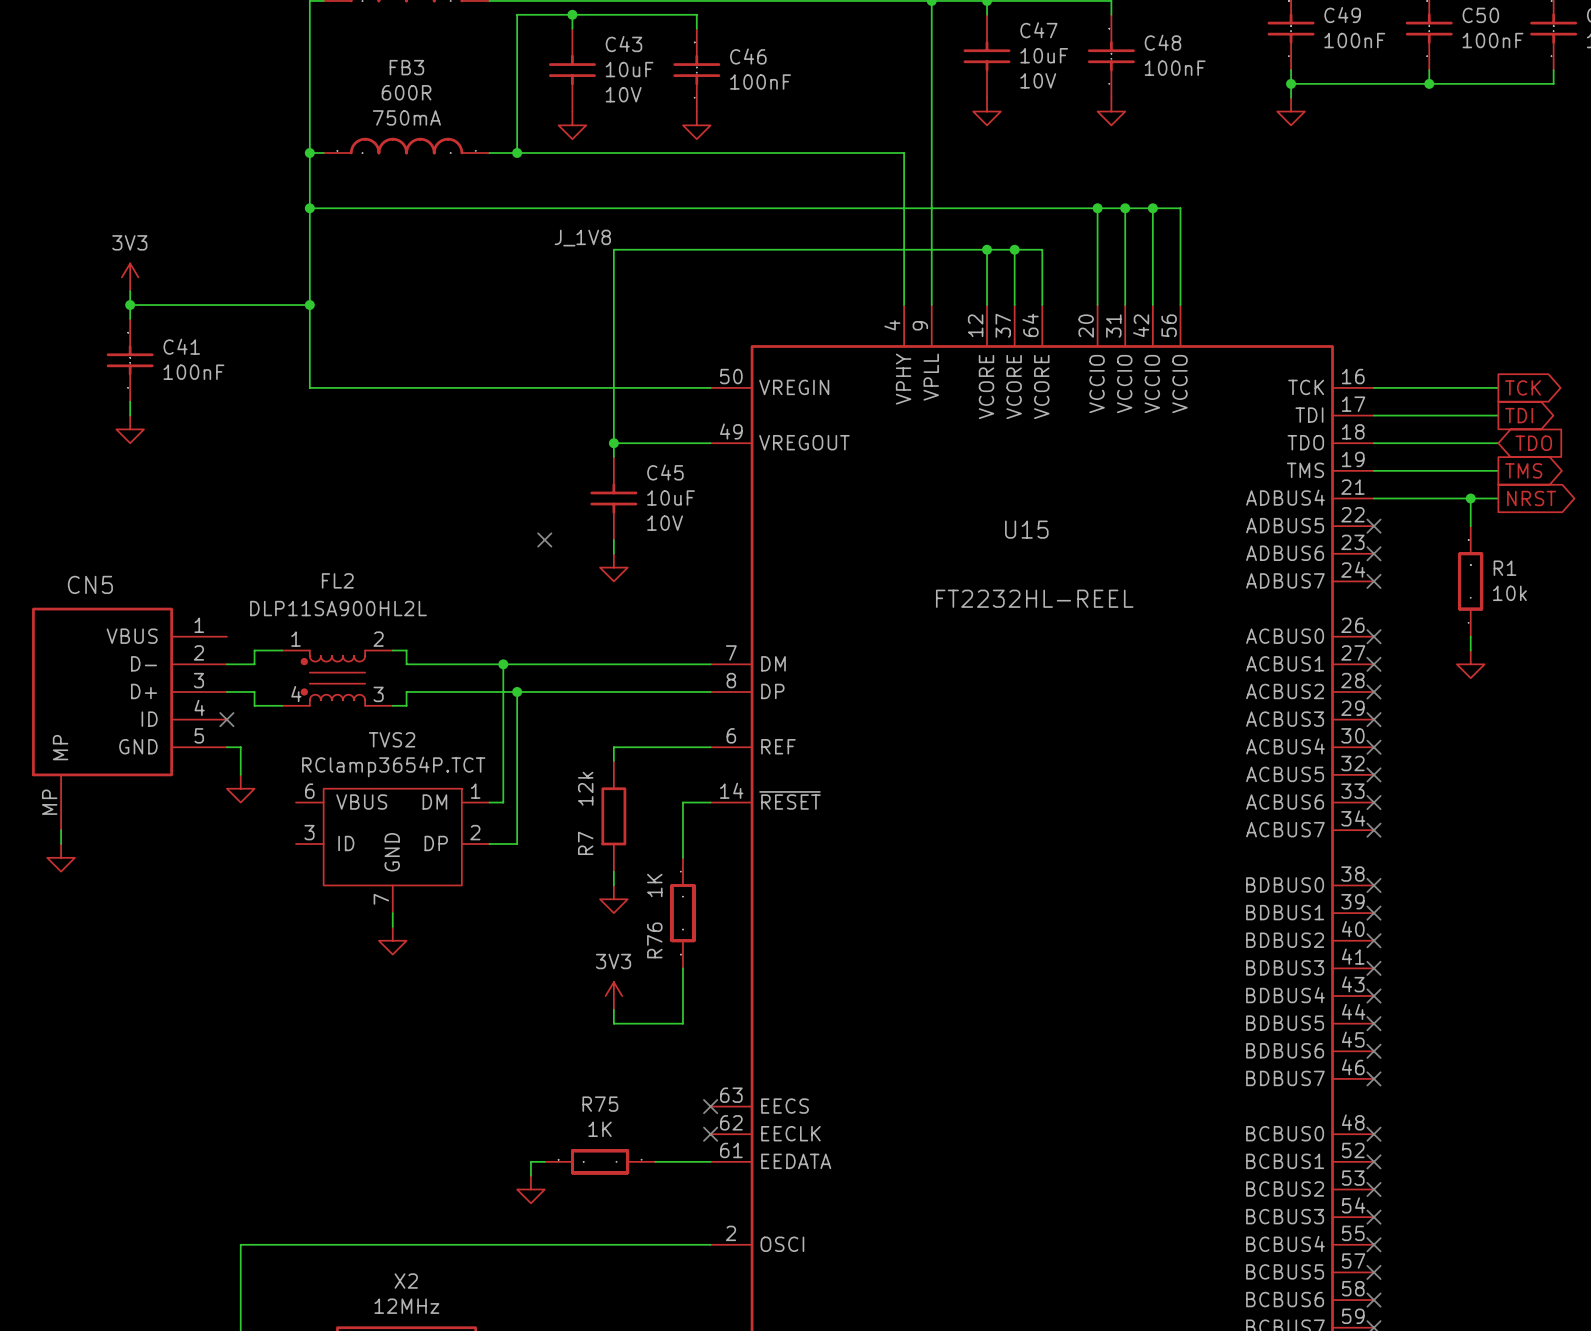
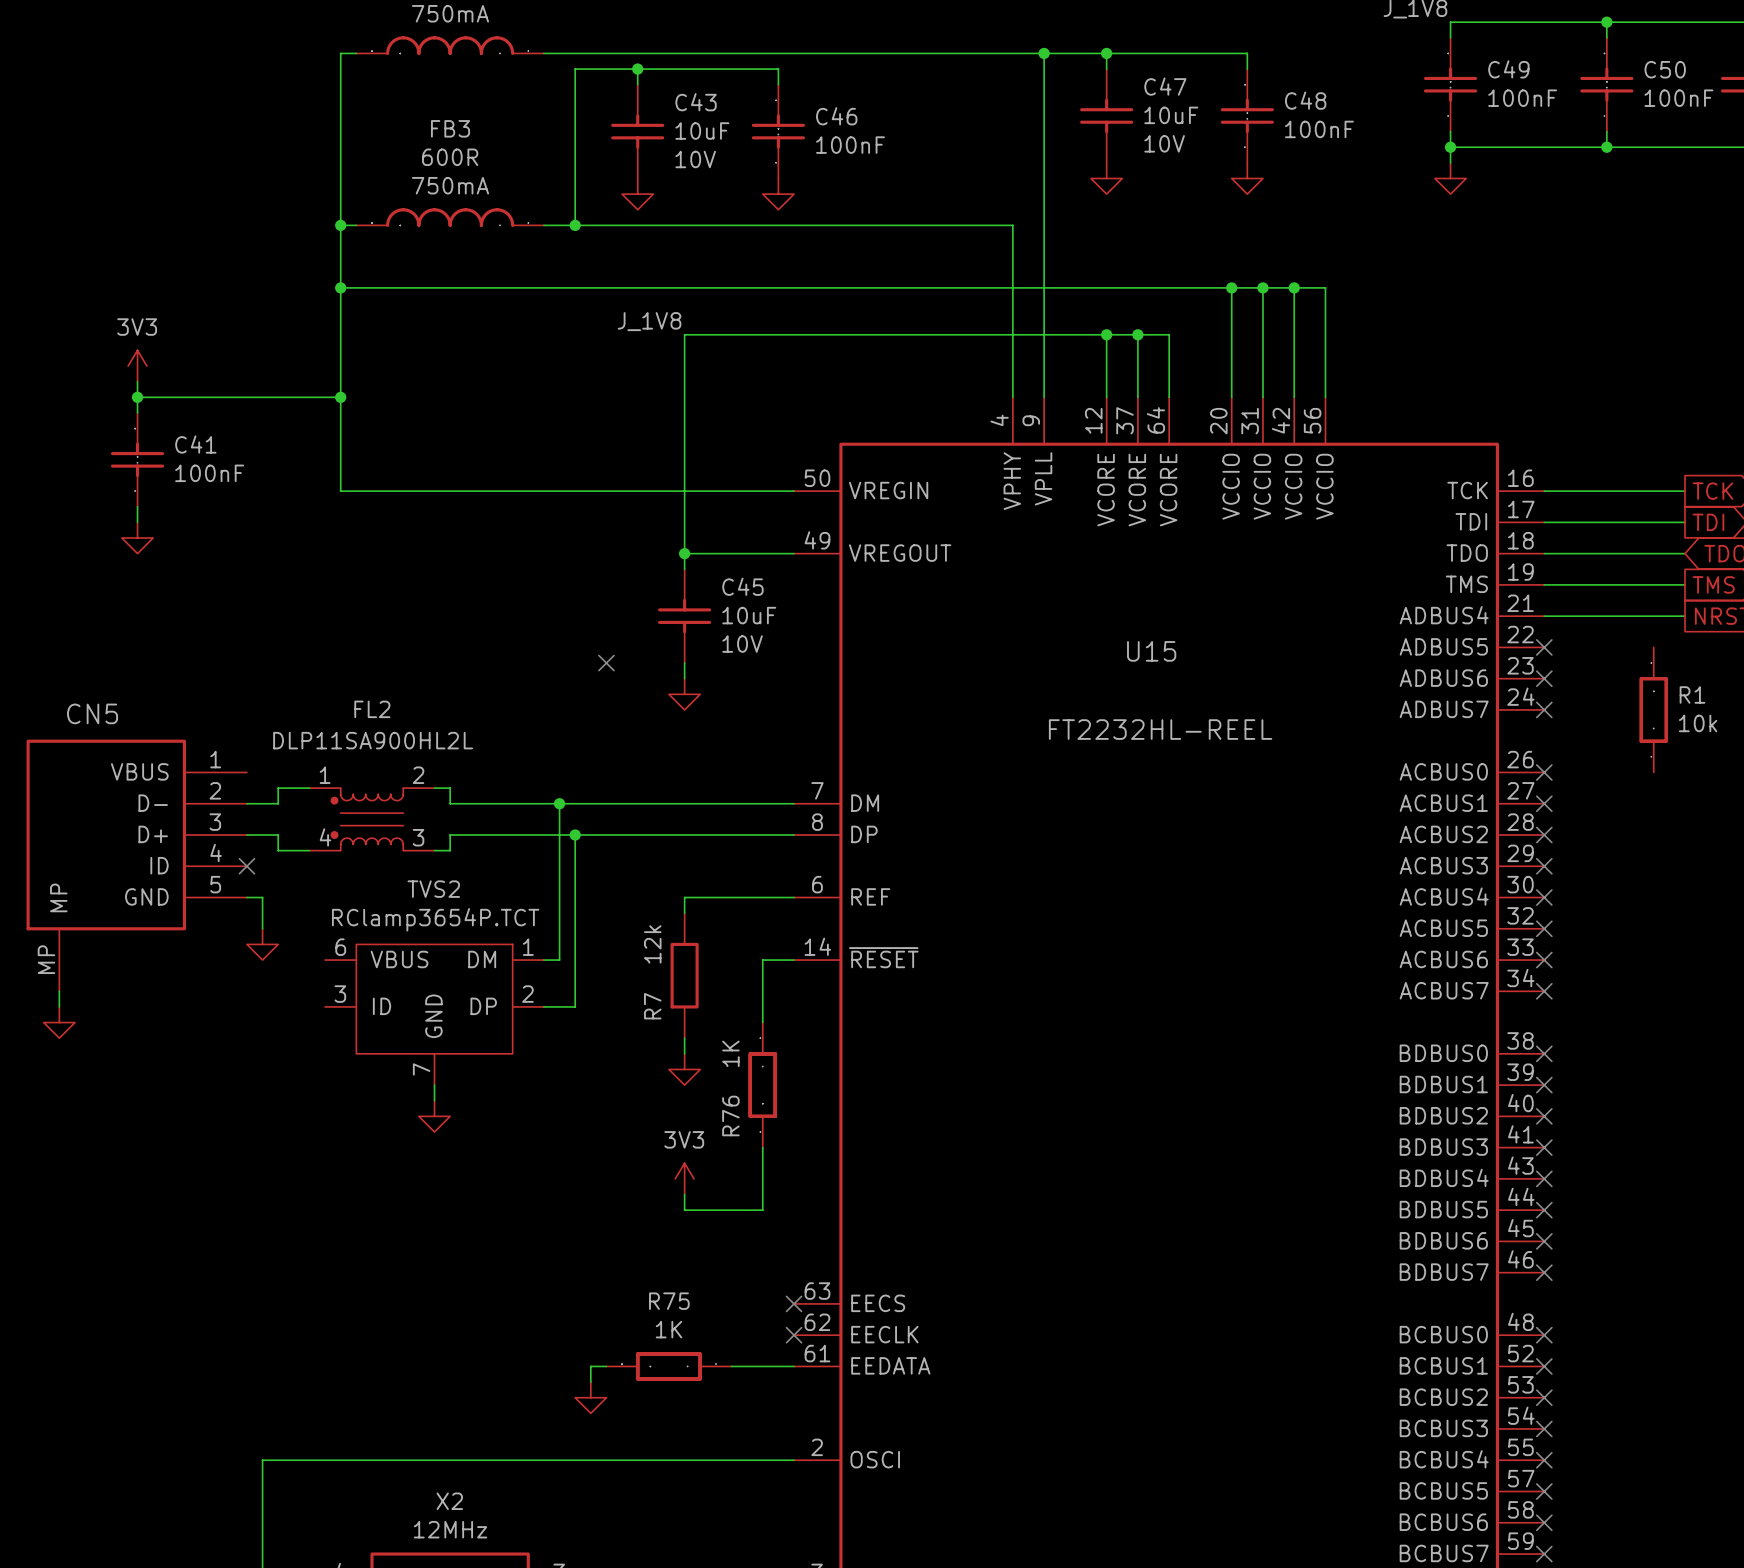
wire: (1470, 498) (1470, 526) -> none
junction: (1470, 498) -> none
wire: (1470, 636) (1470, 650) -> none
power symbol: (1470, 664) -> none

